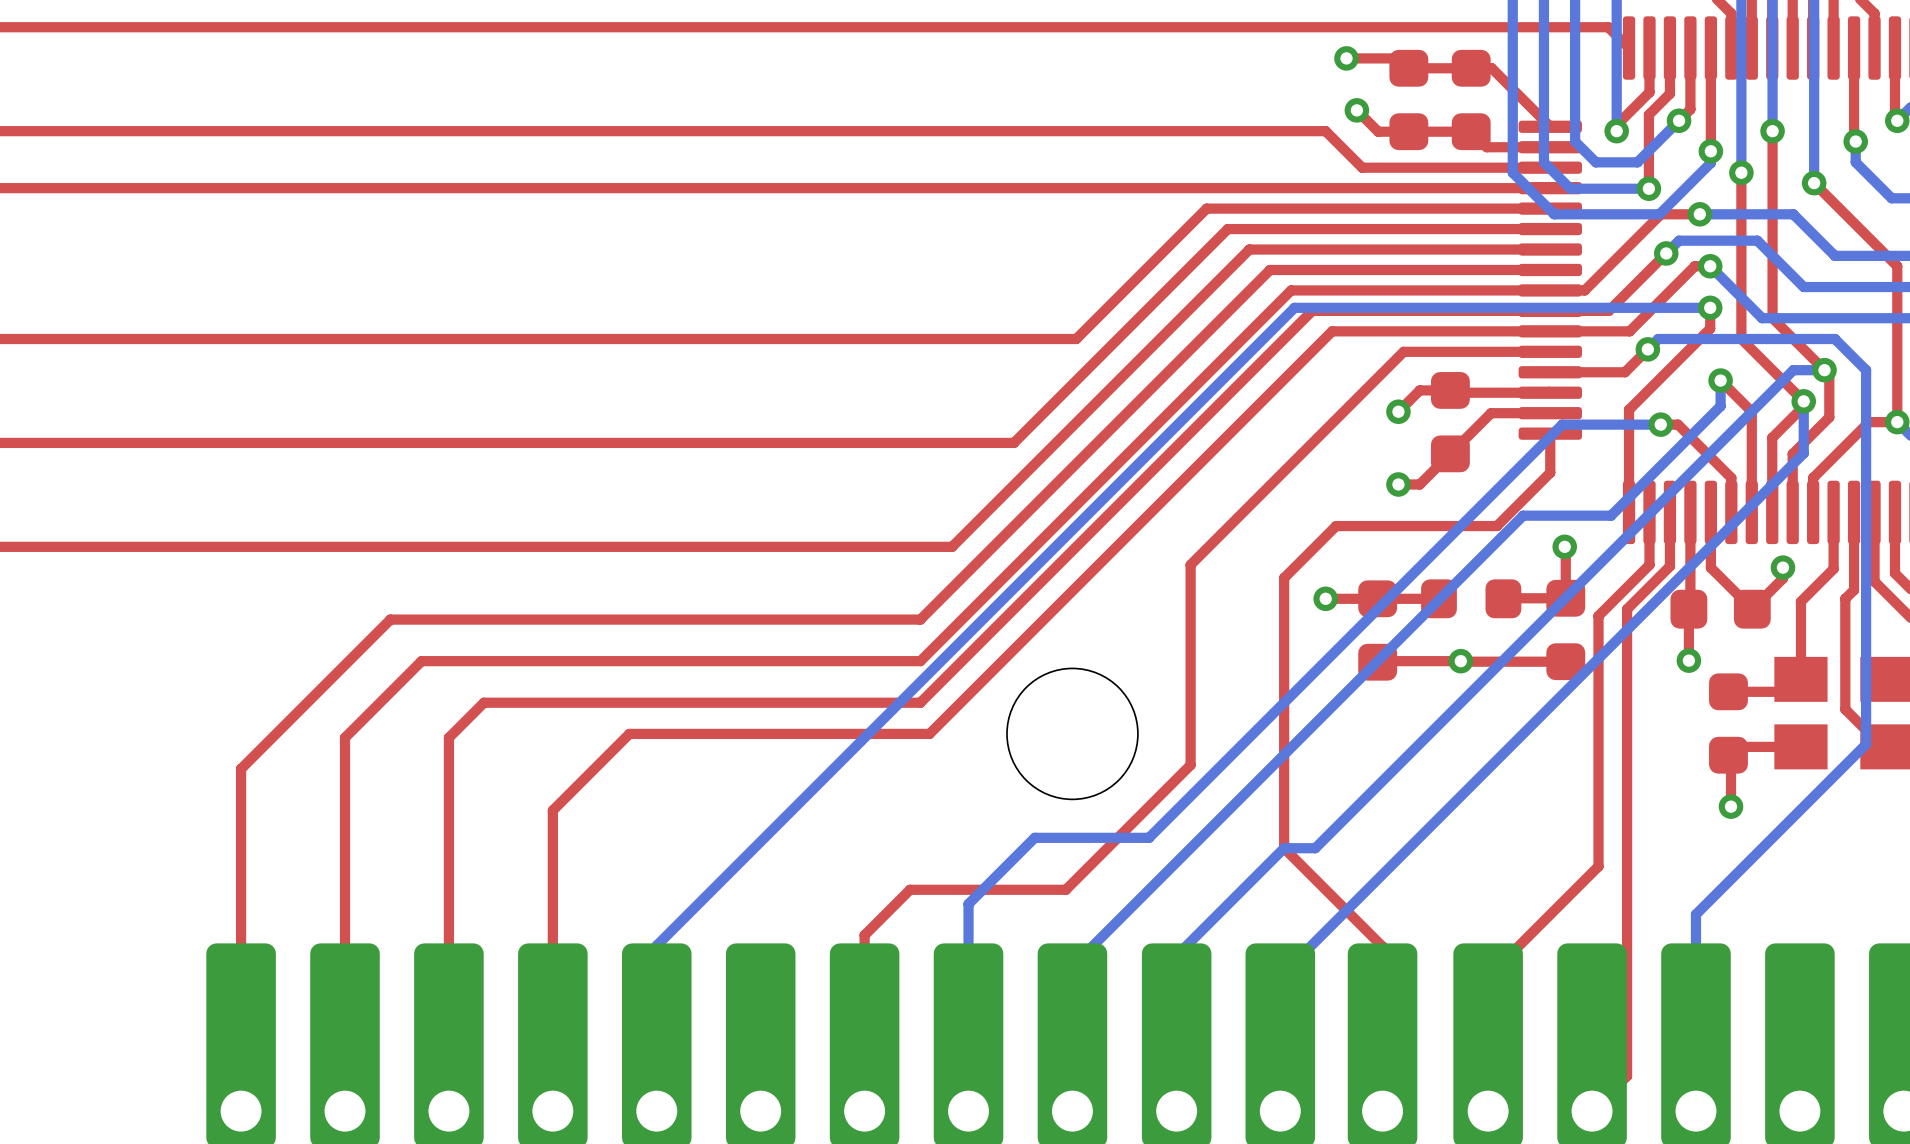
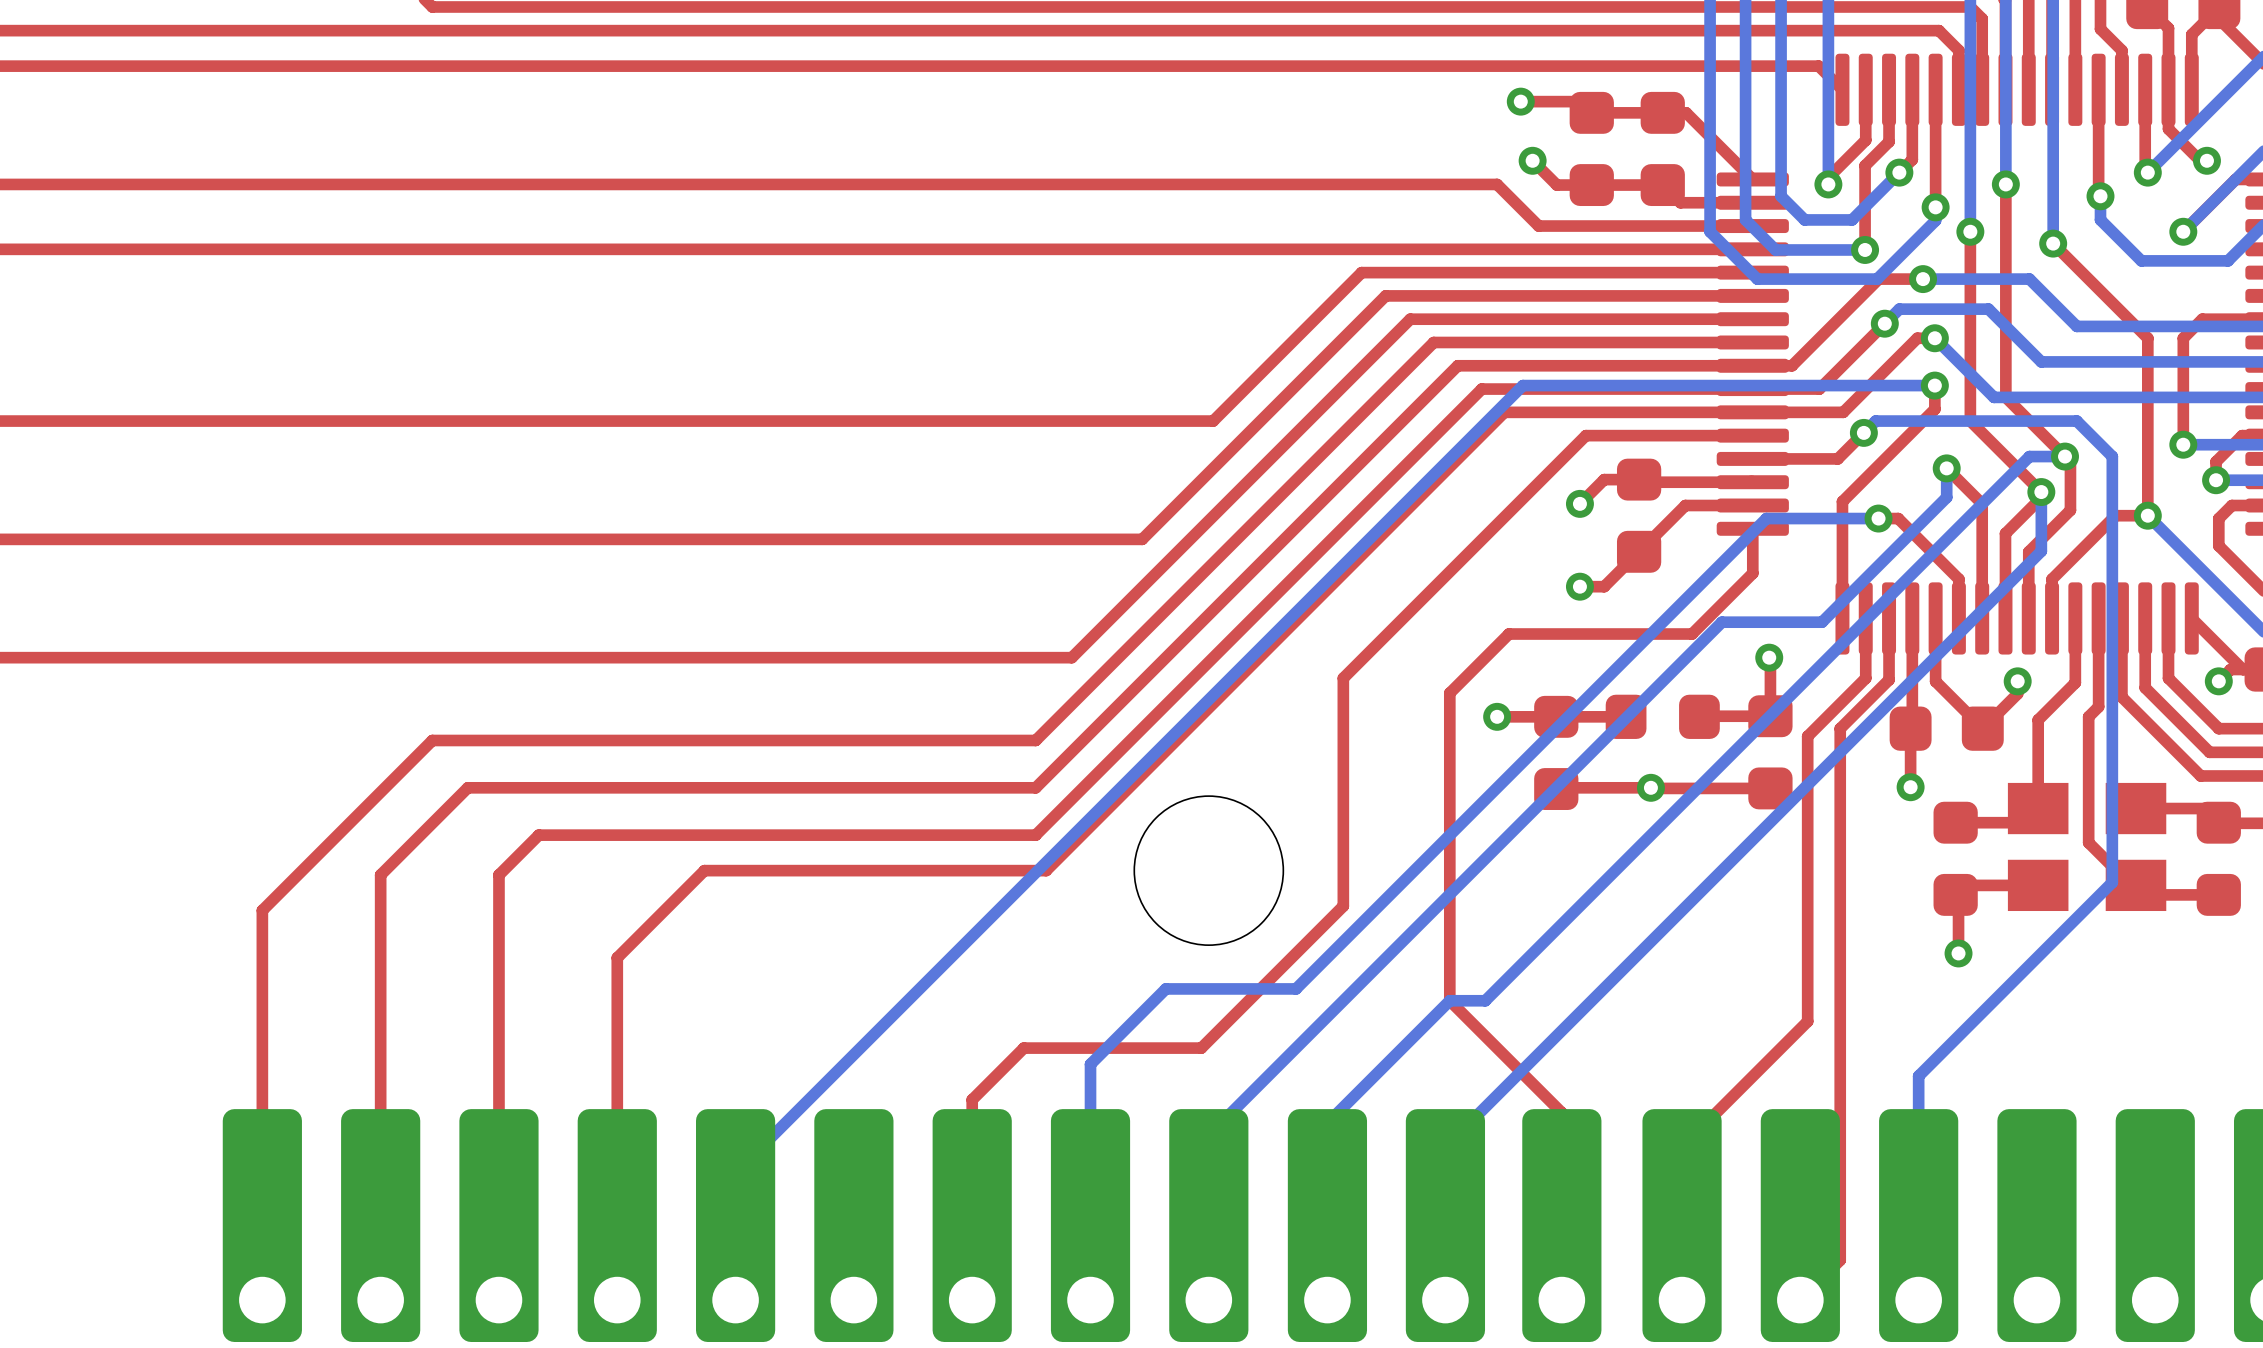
bottom track: (1348, 307) (1294, 307) (656, 945) (656, 999) -> (1522, 385) (735, 1172)

